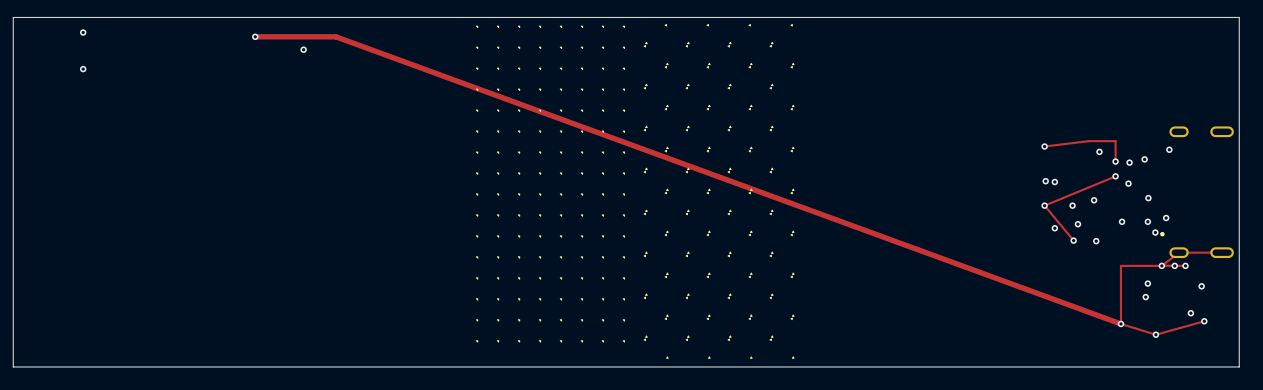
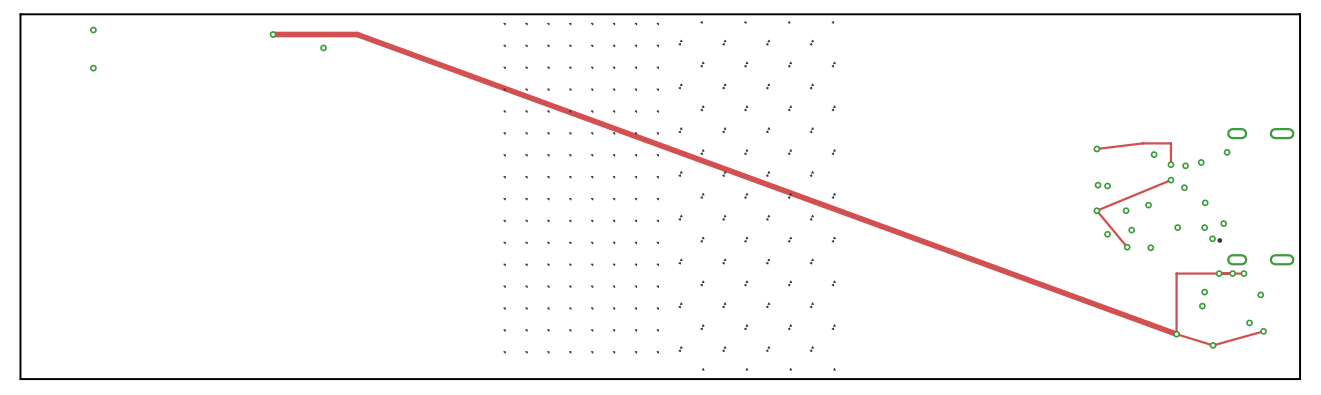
track: (1222, 252) (1179, 252) (1161, 265) -> none

